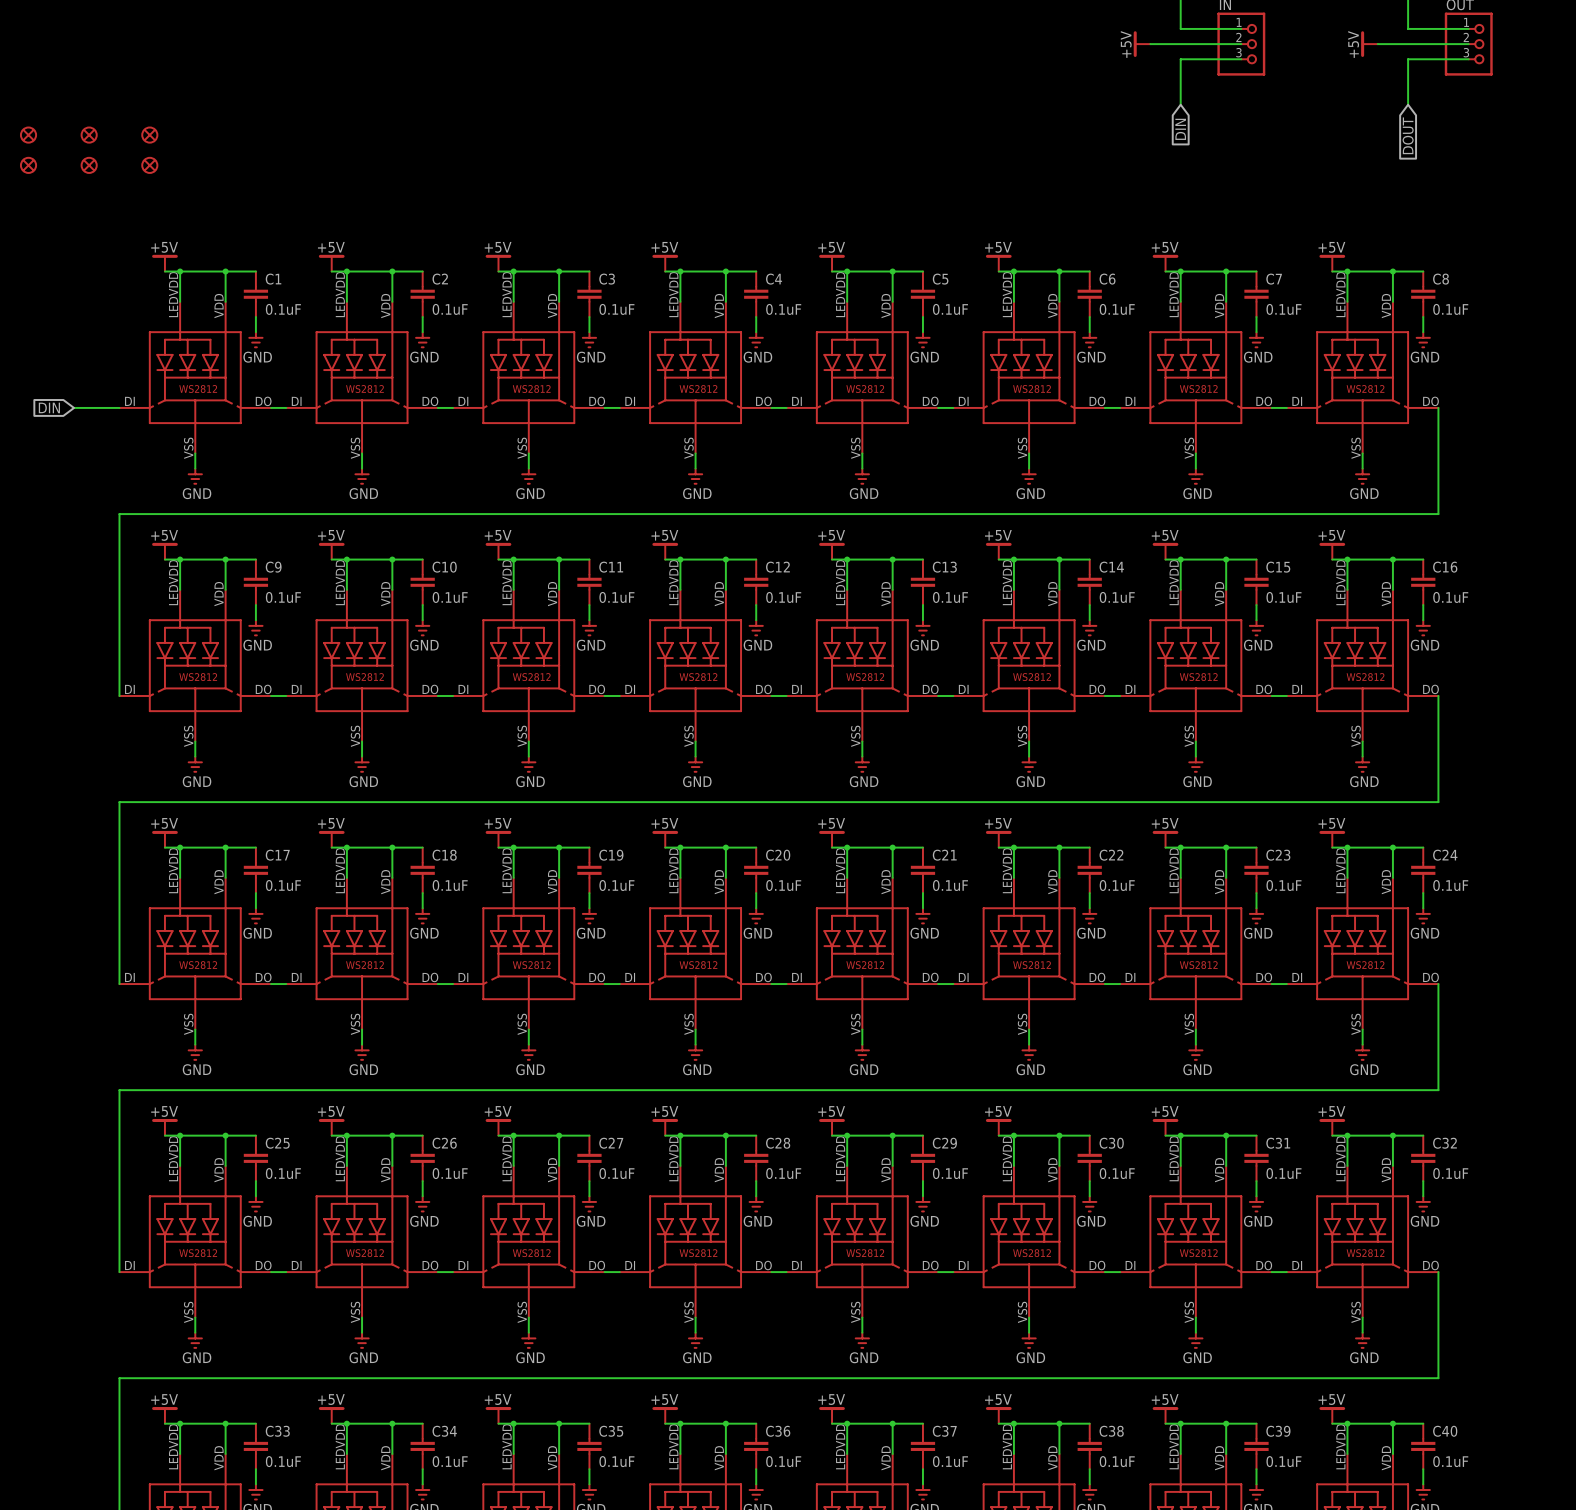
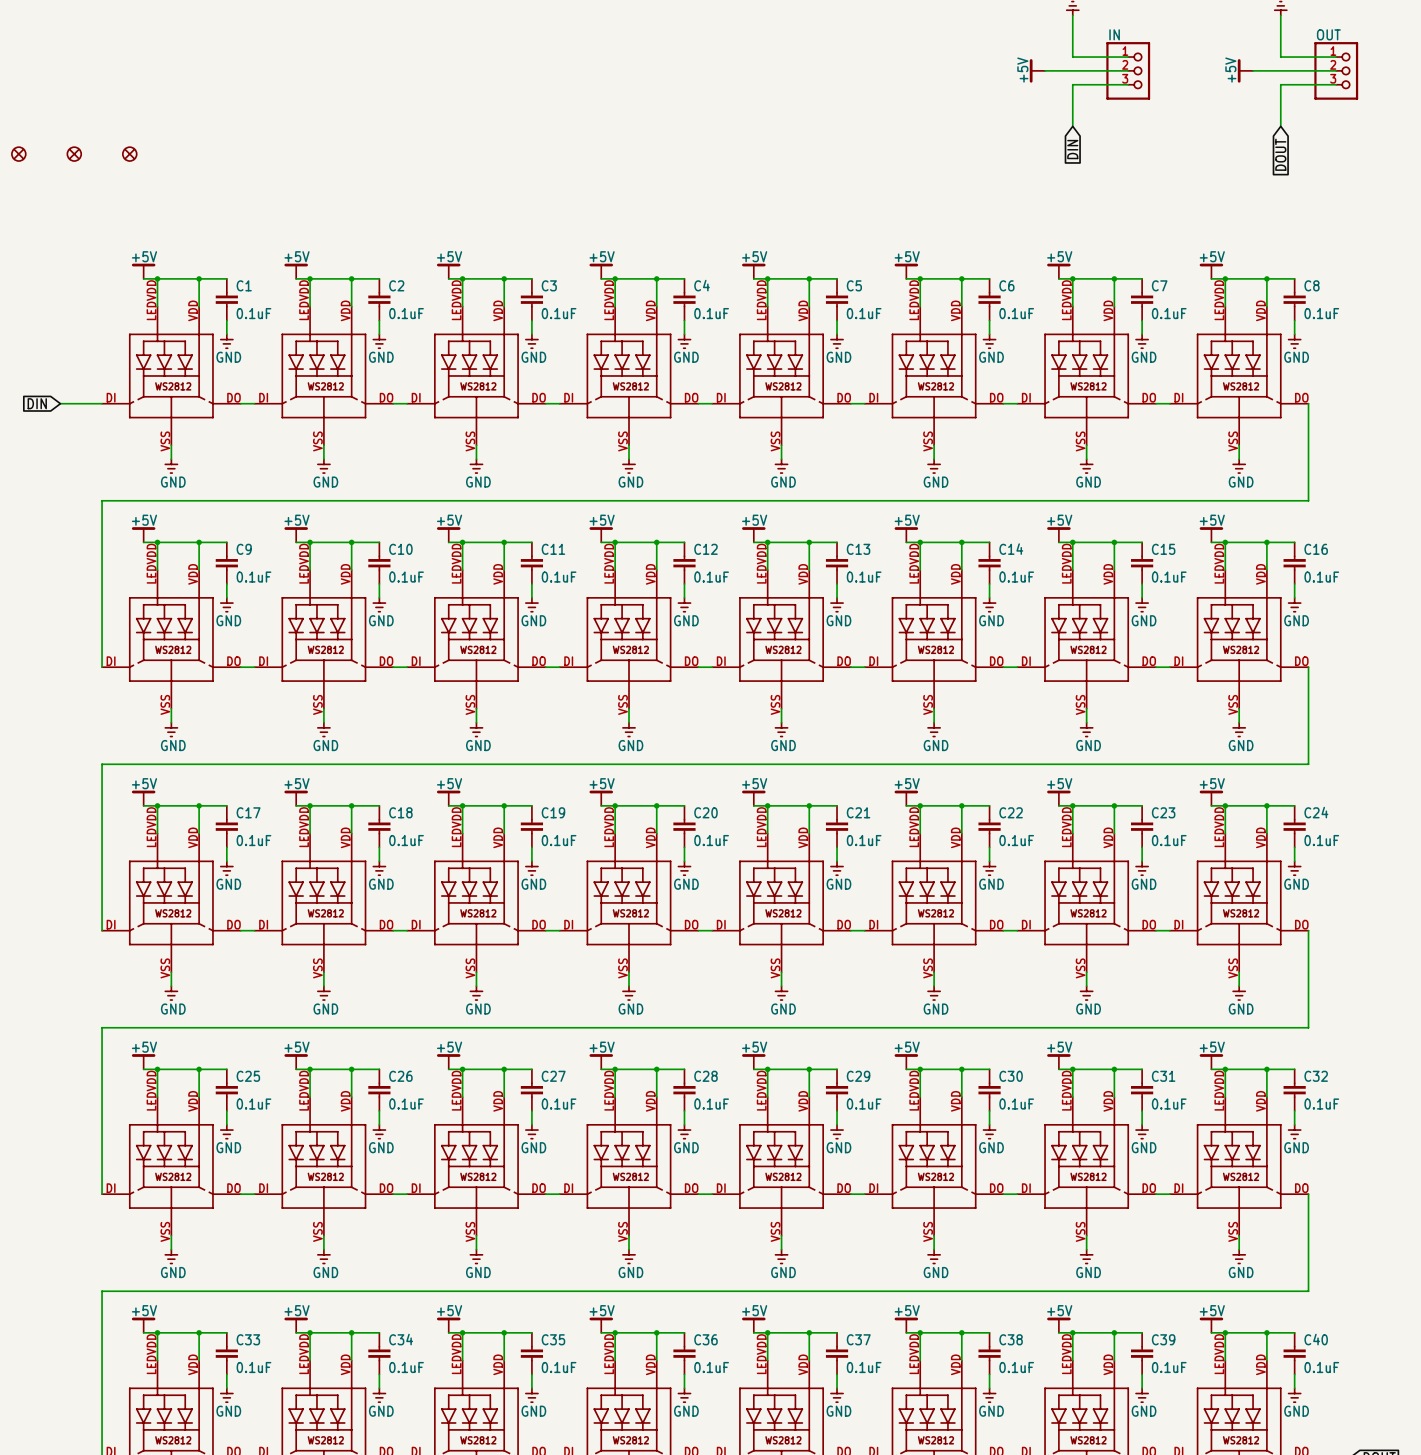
part: (28, 165) -> none
part: (89, 165) -> none
part: (149, 165) -> none

